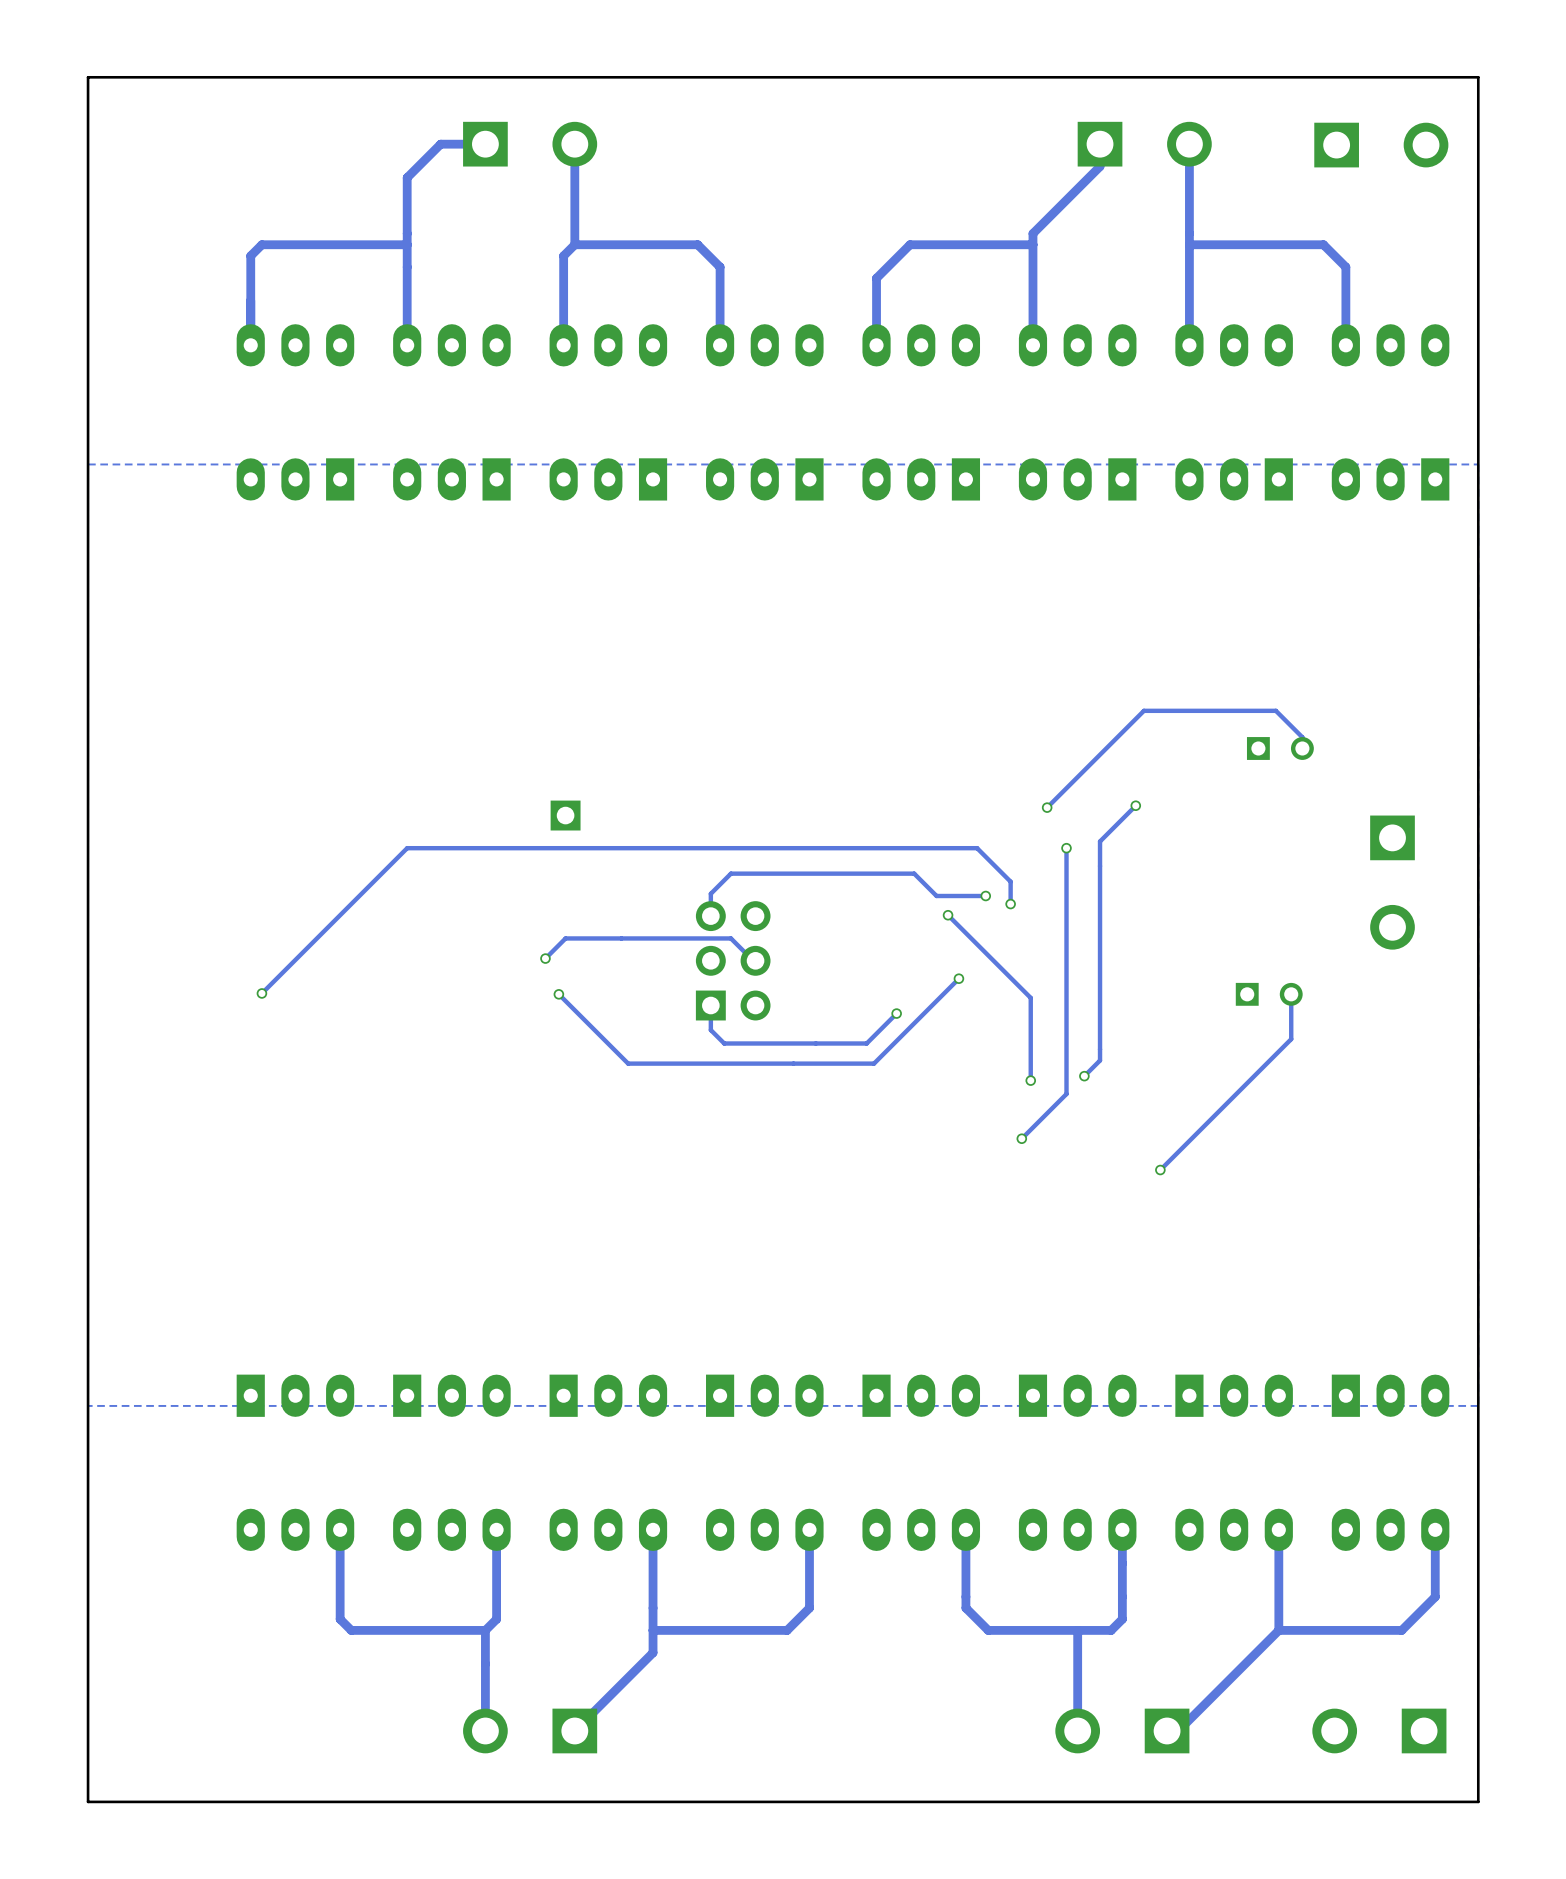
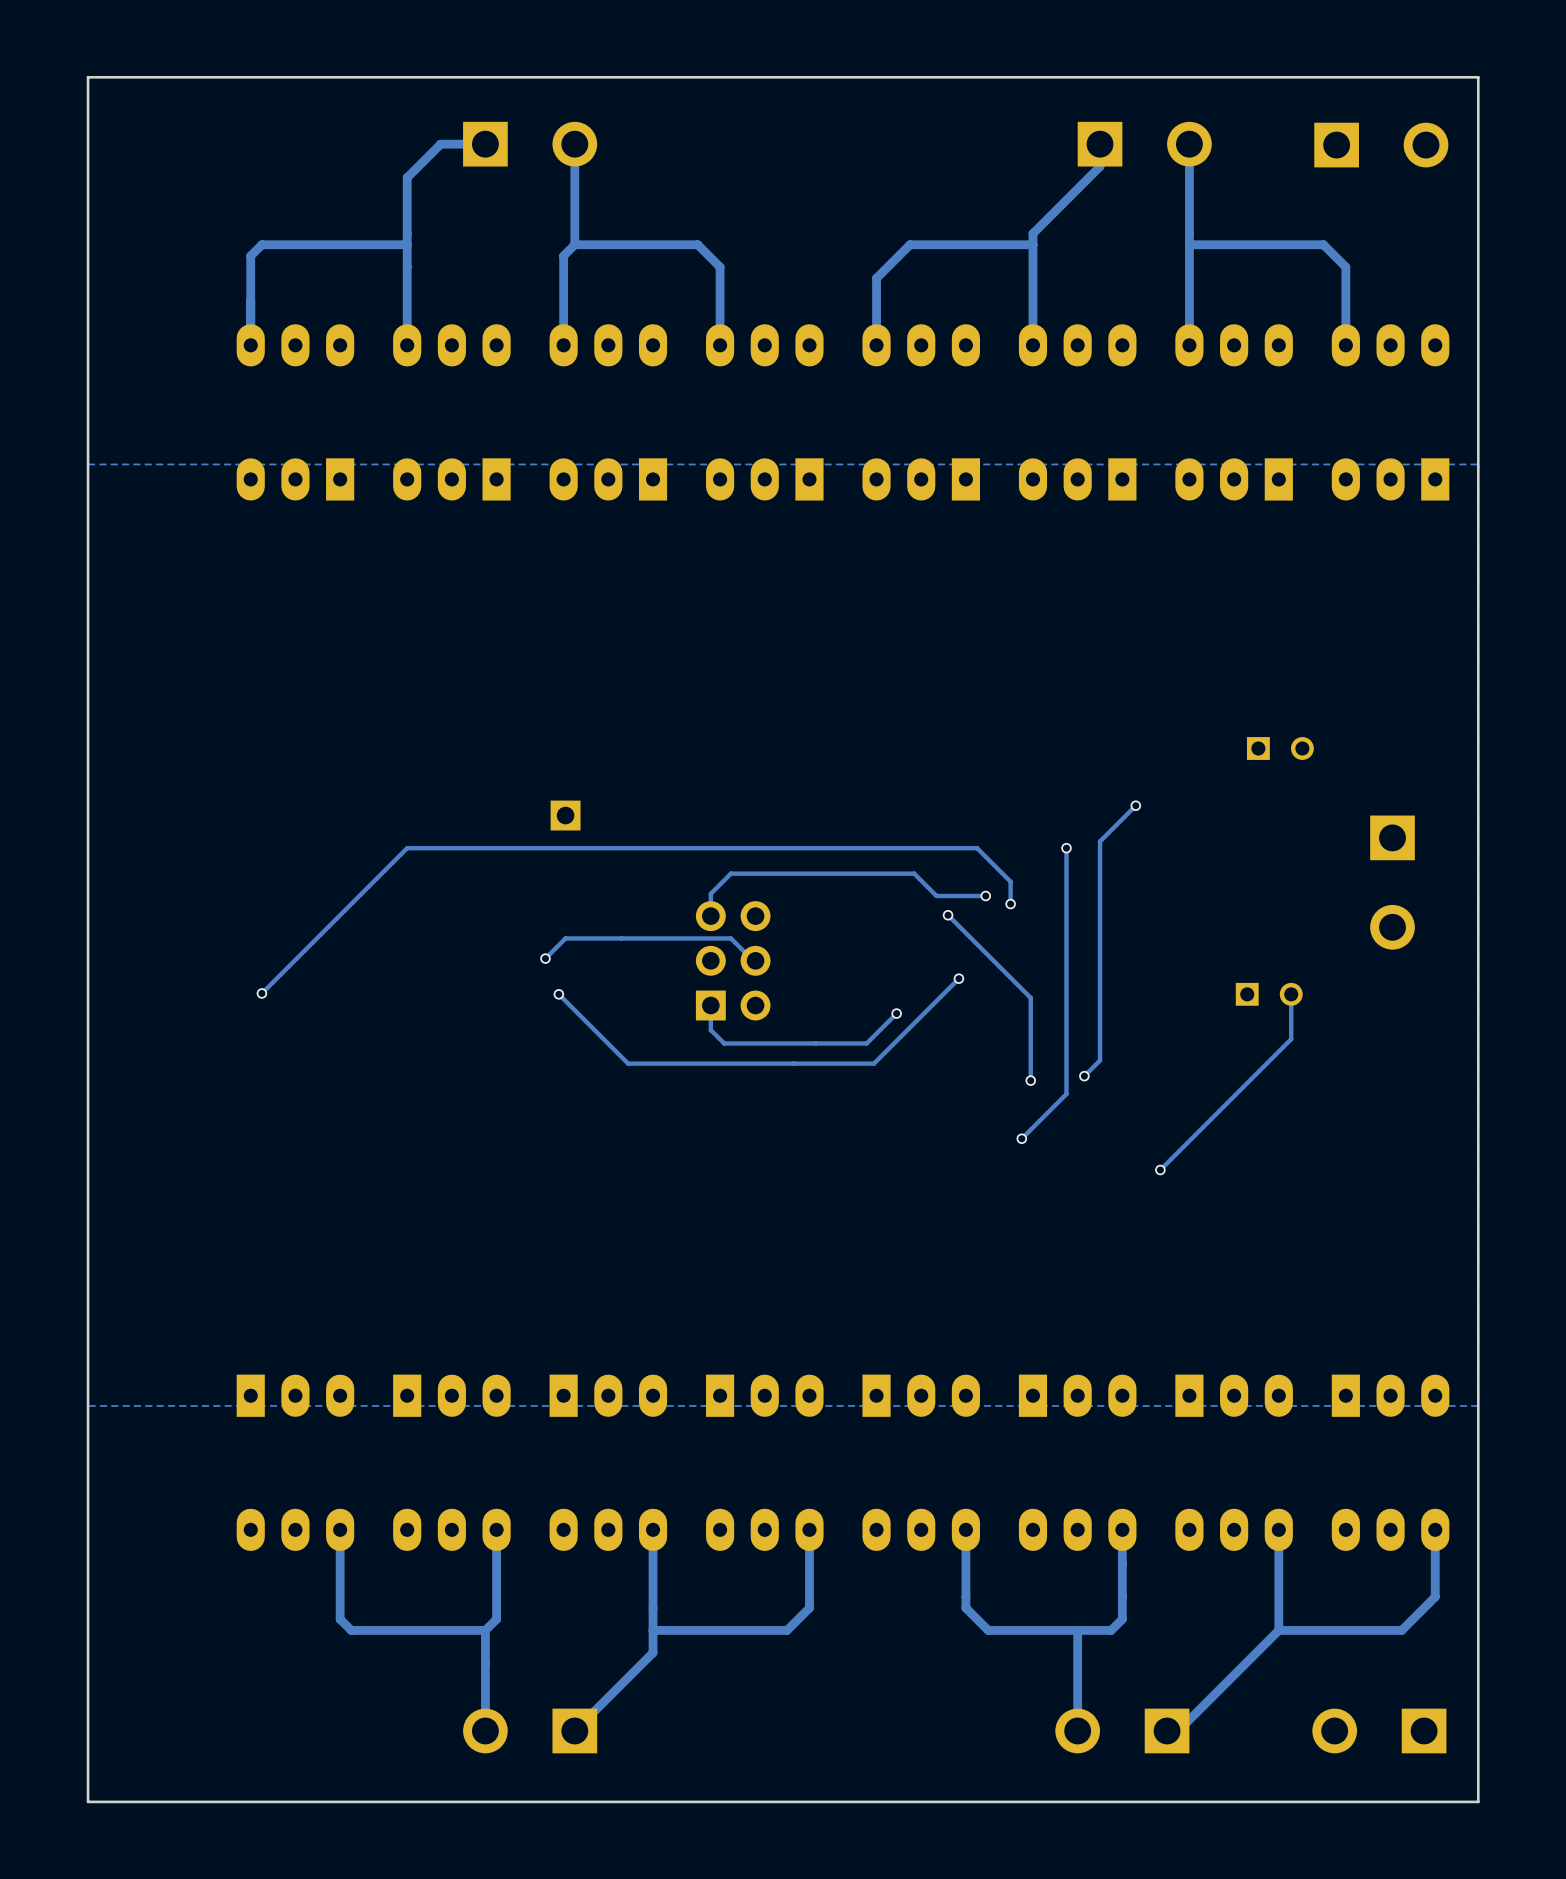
track: (1302, 748) (1302, 737) (1275, 710) (1143, 710) (1047, 807) -> none
via: (1047, 807) -> none

